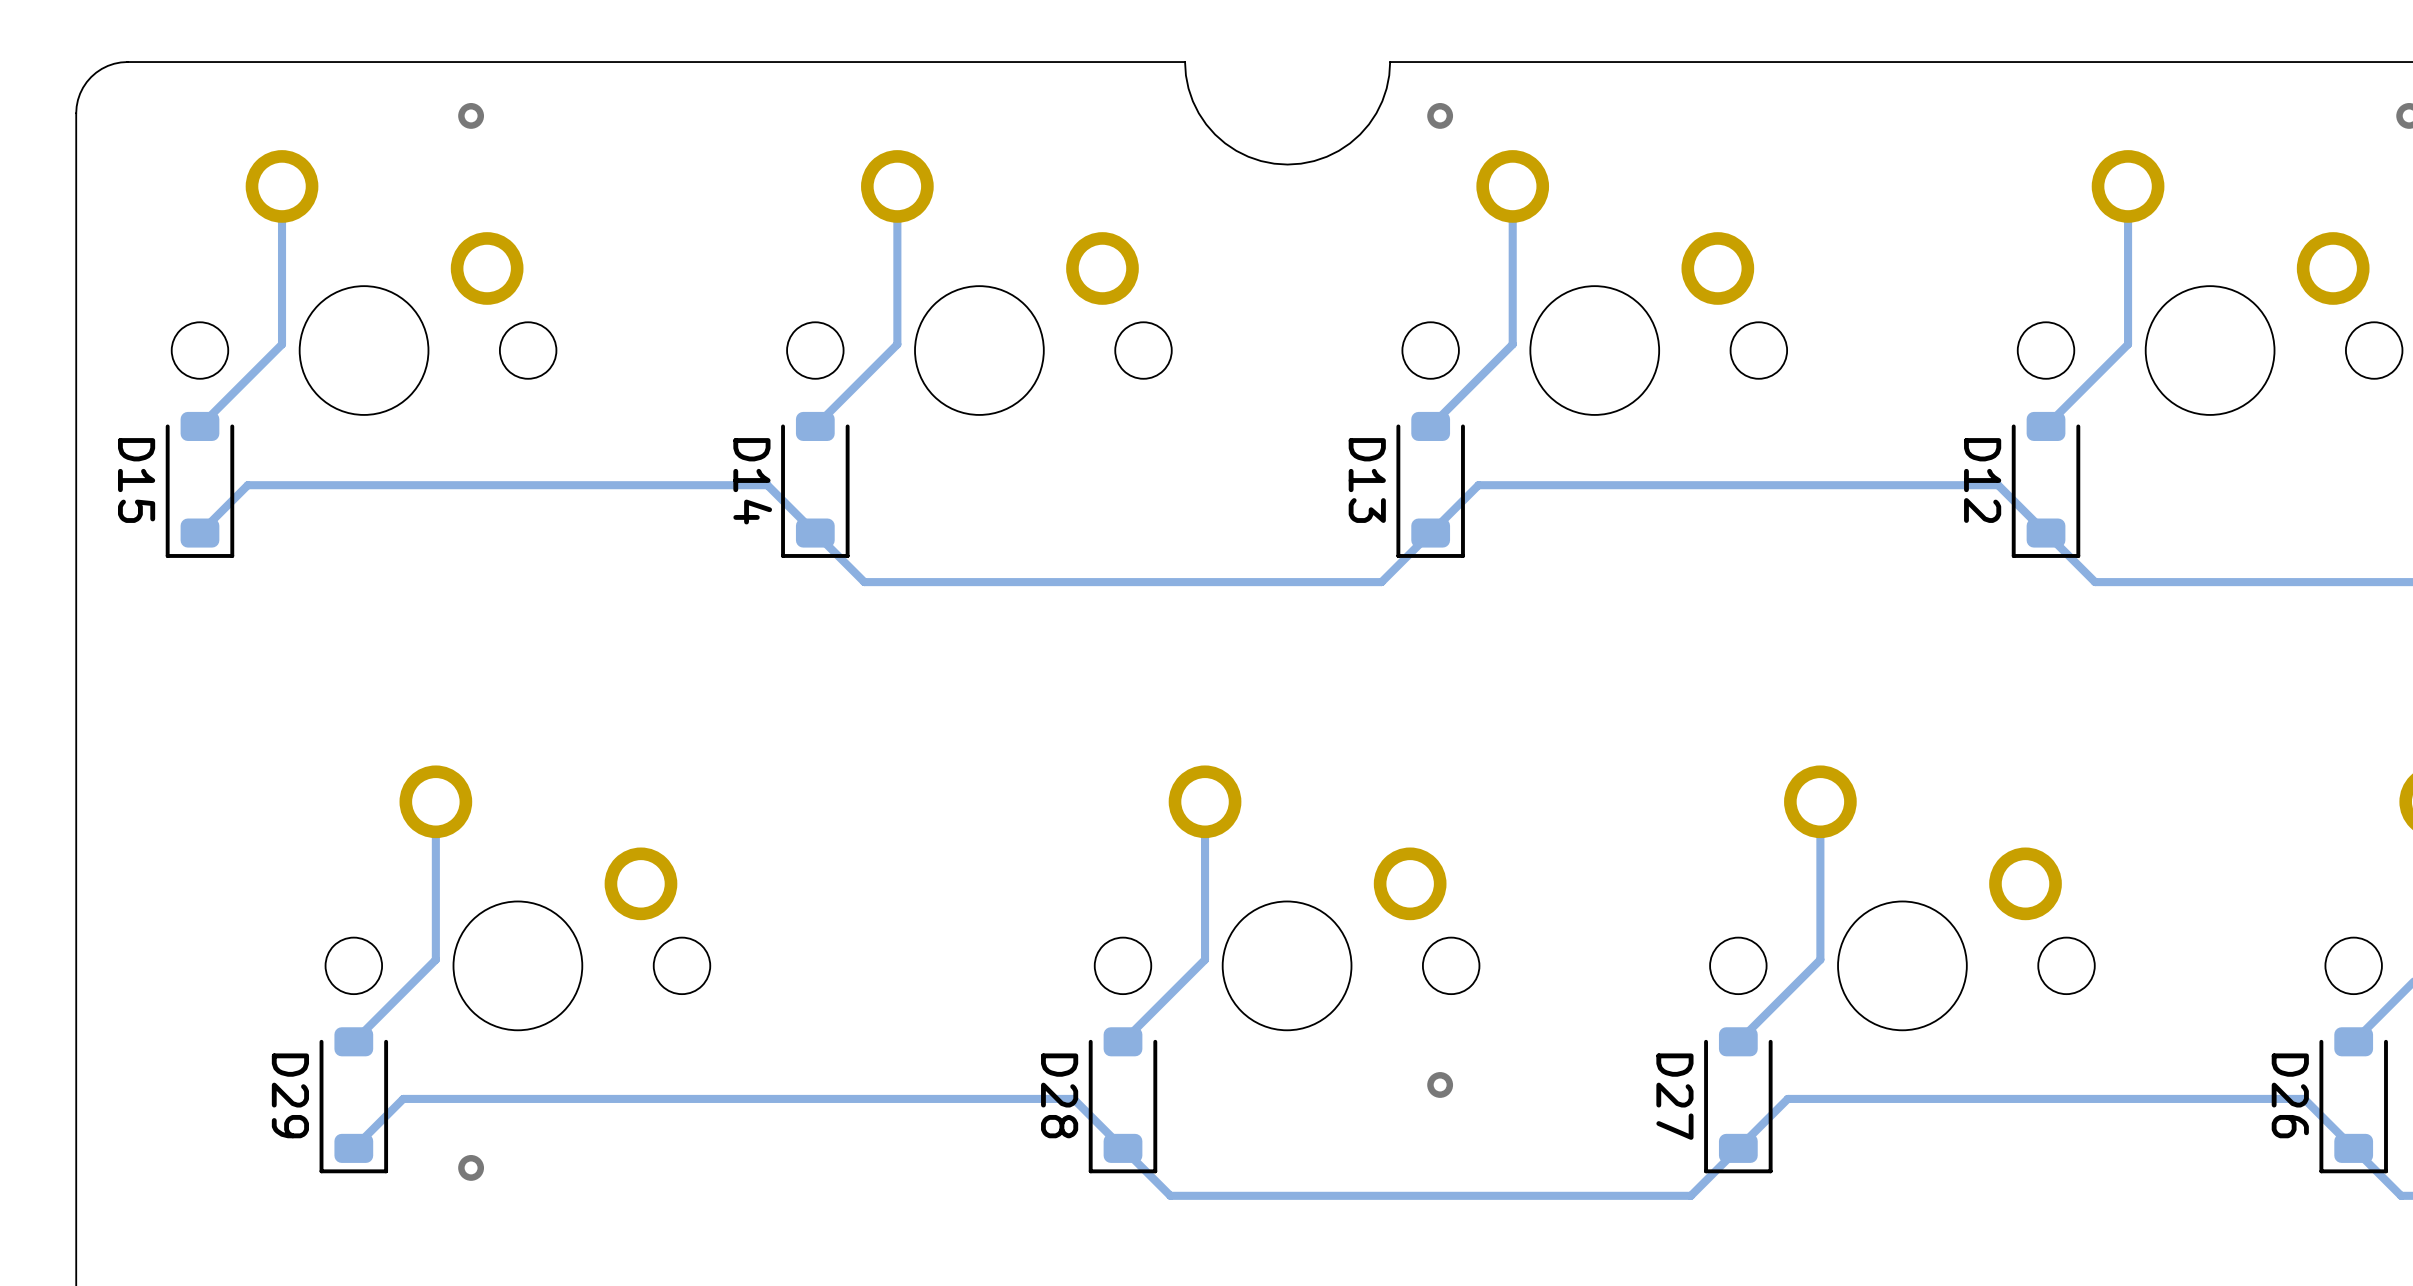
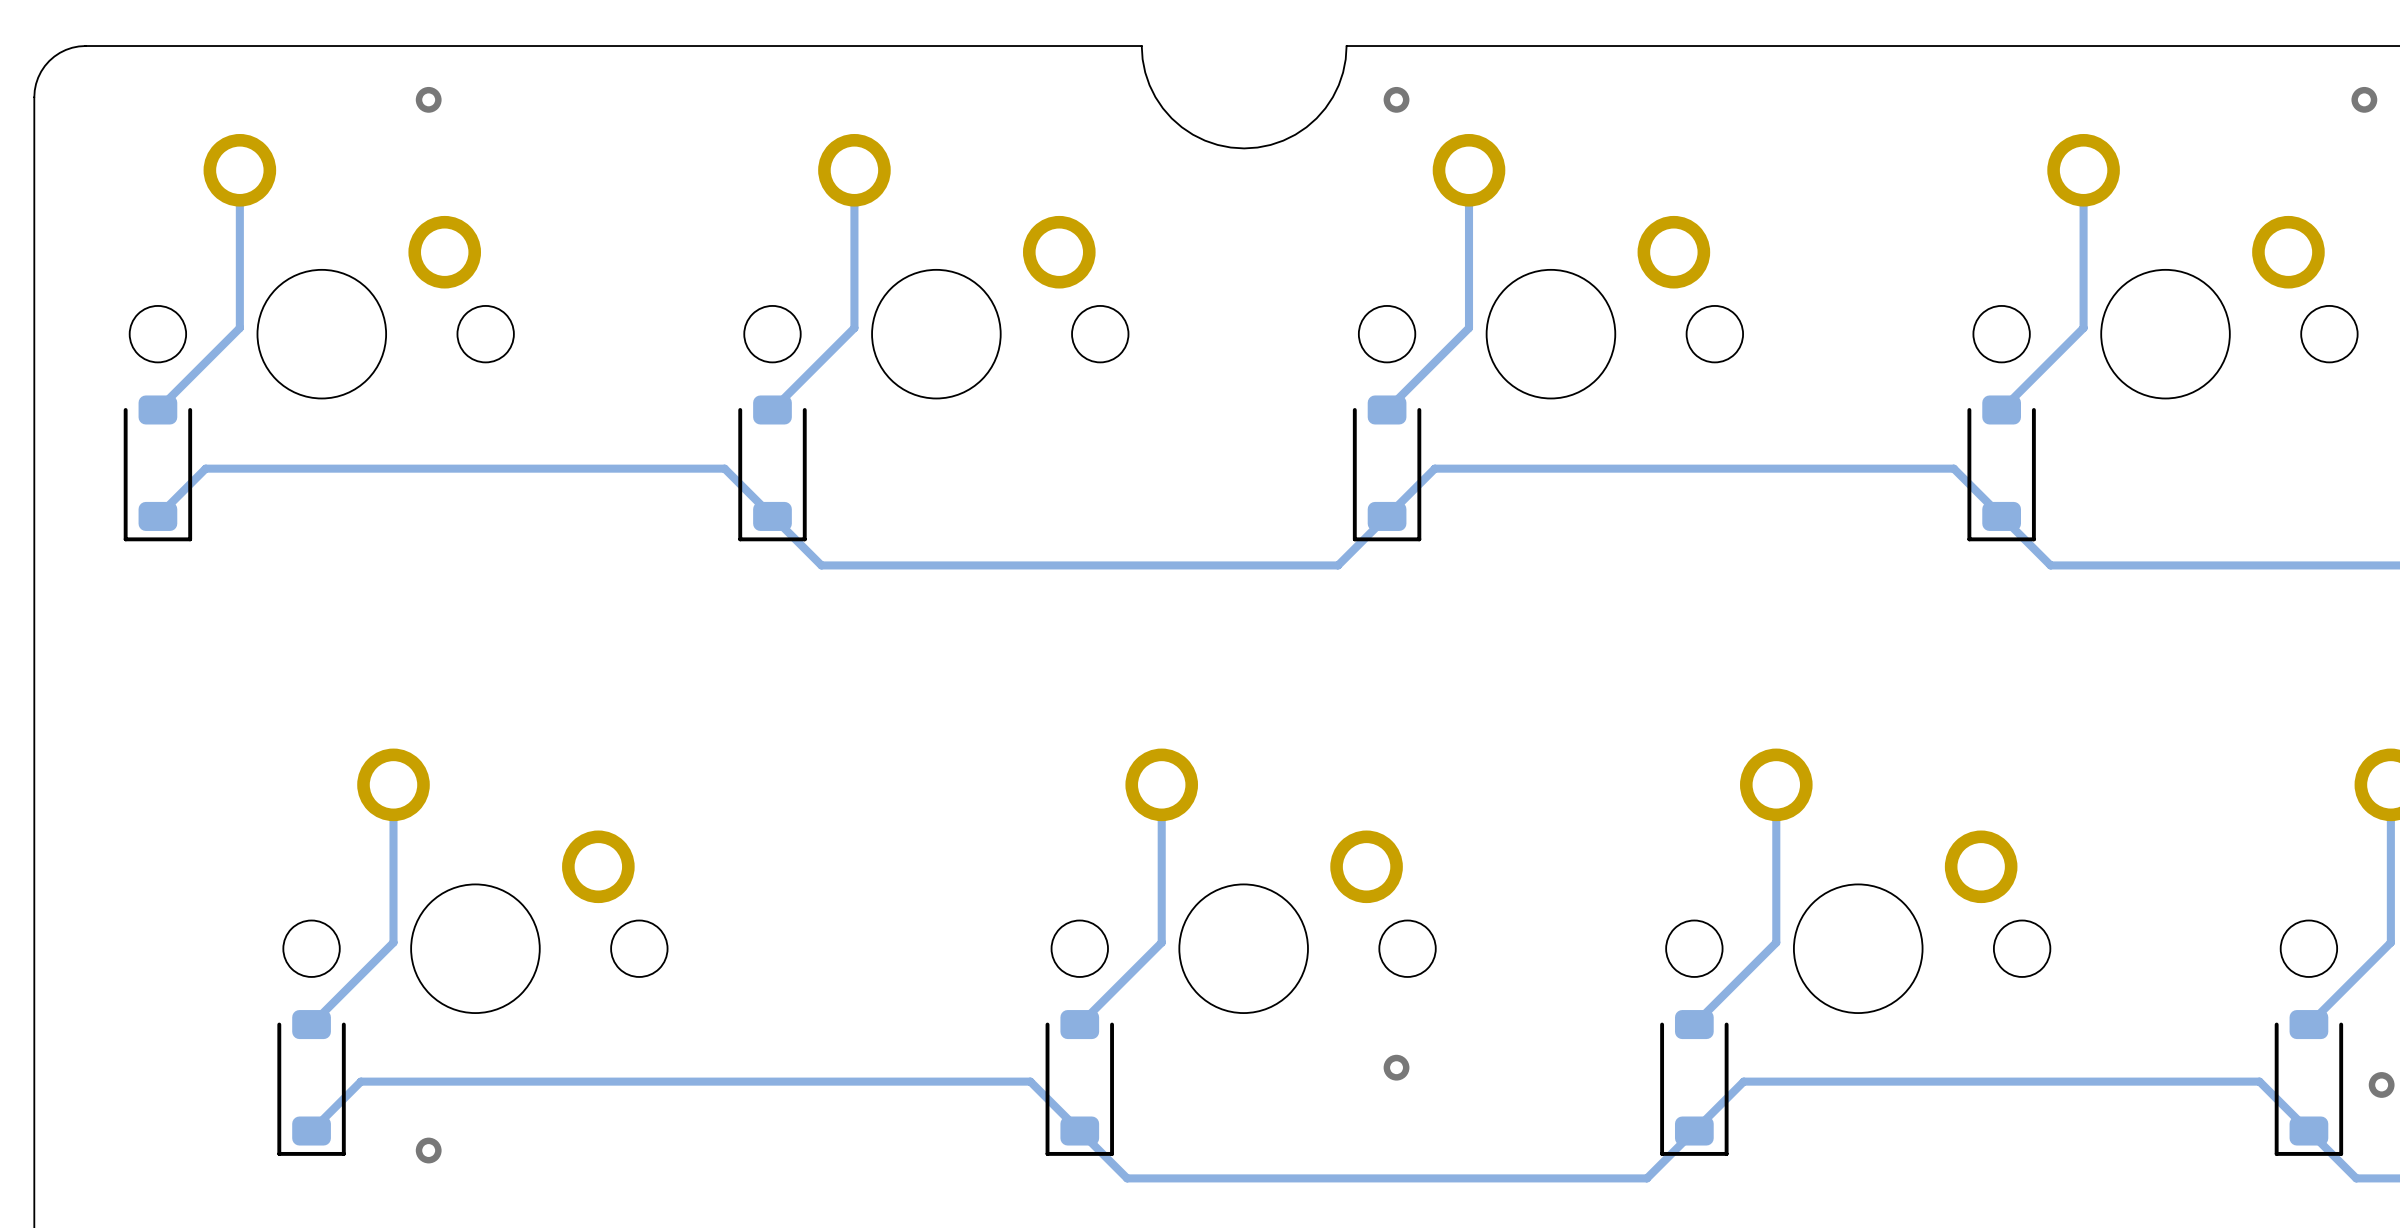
D15 name: D15 (136, 480) -> none
D13 name: D13 (1367, 480) -> none
D12 name: D12 (1982, 480) -> none
D14 name: D14 (752, 481) -> none
D29 name: D29 (290, 1095) -> none
D28 name: D28 (1059, 1095) -> none
D26 name: D26 (2290, 1095) -> none
D27 name: D27 (1674, 1096) -> none

